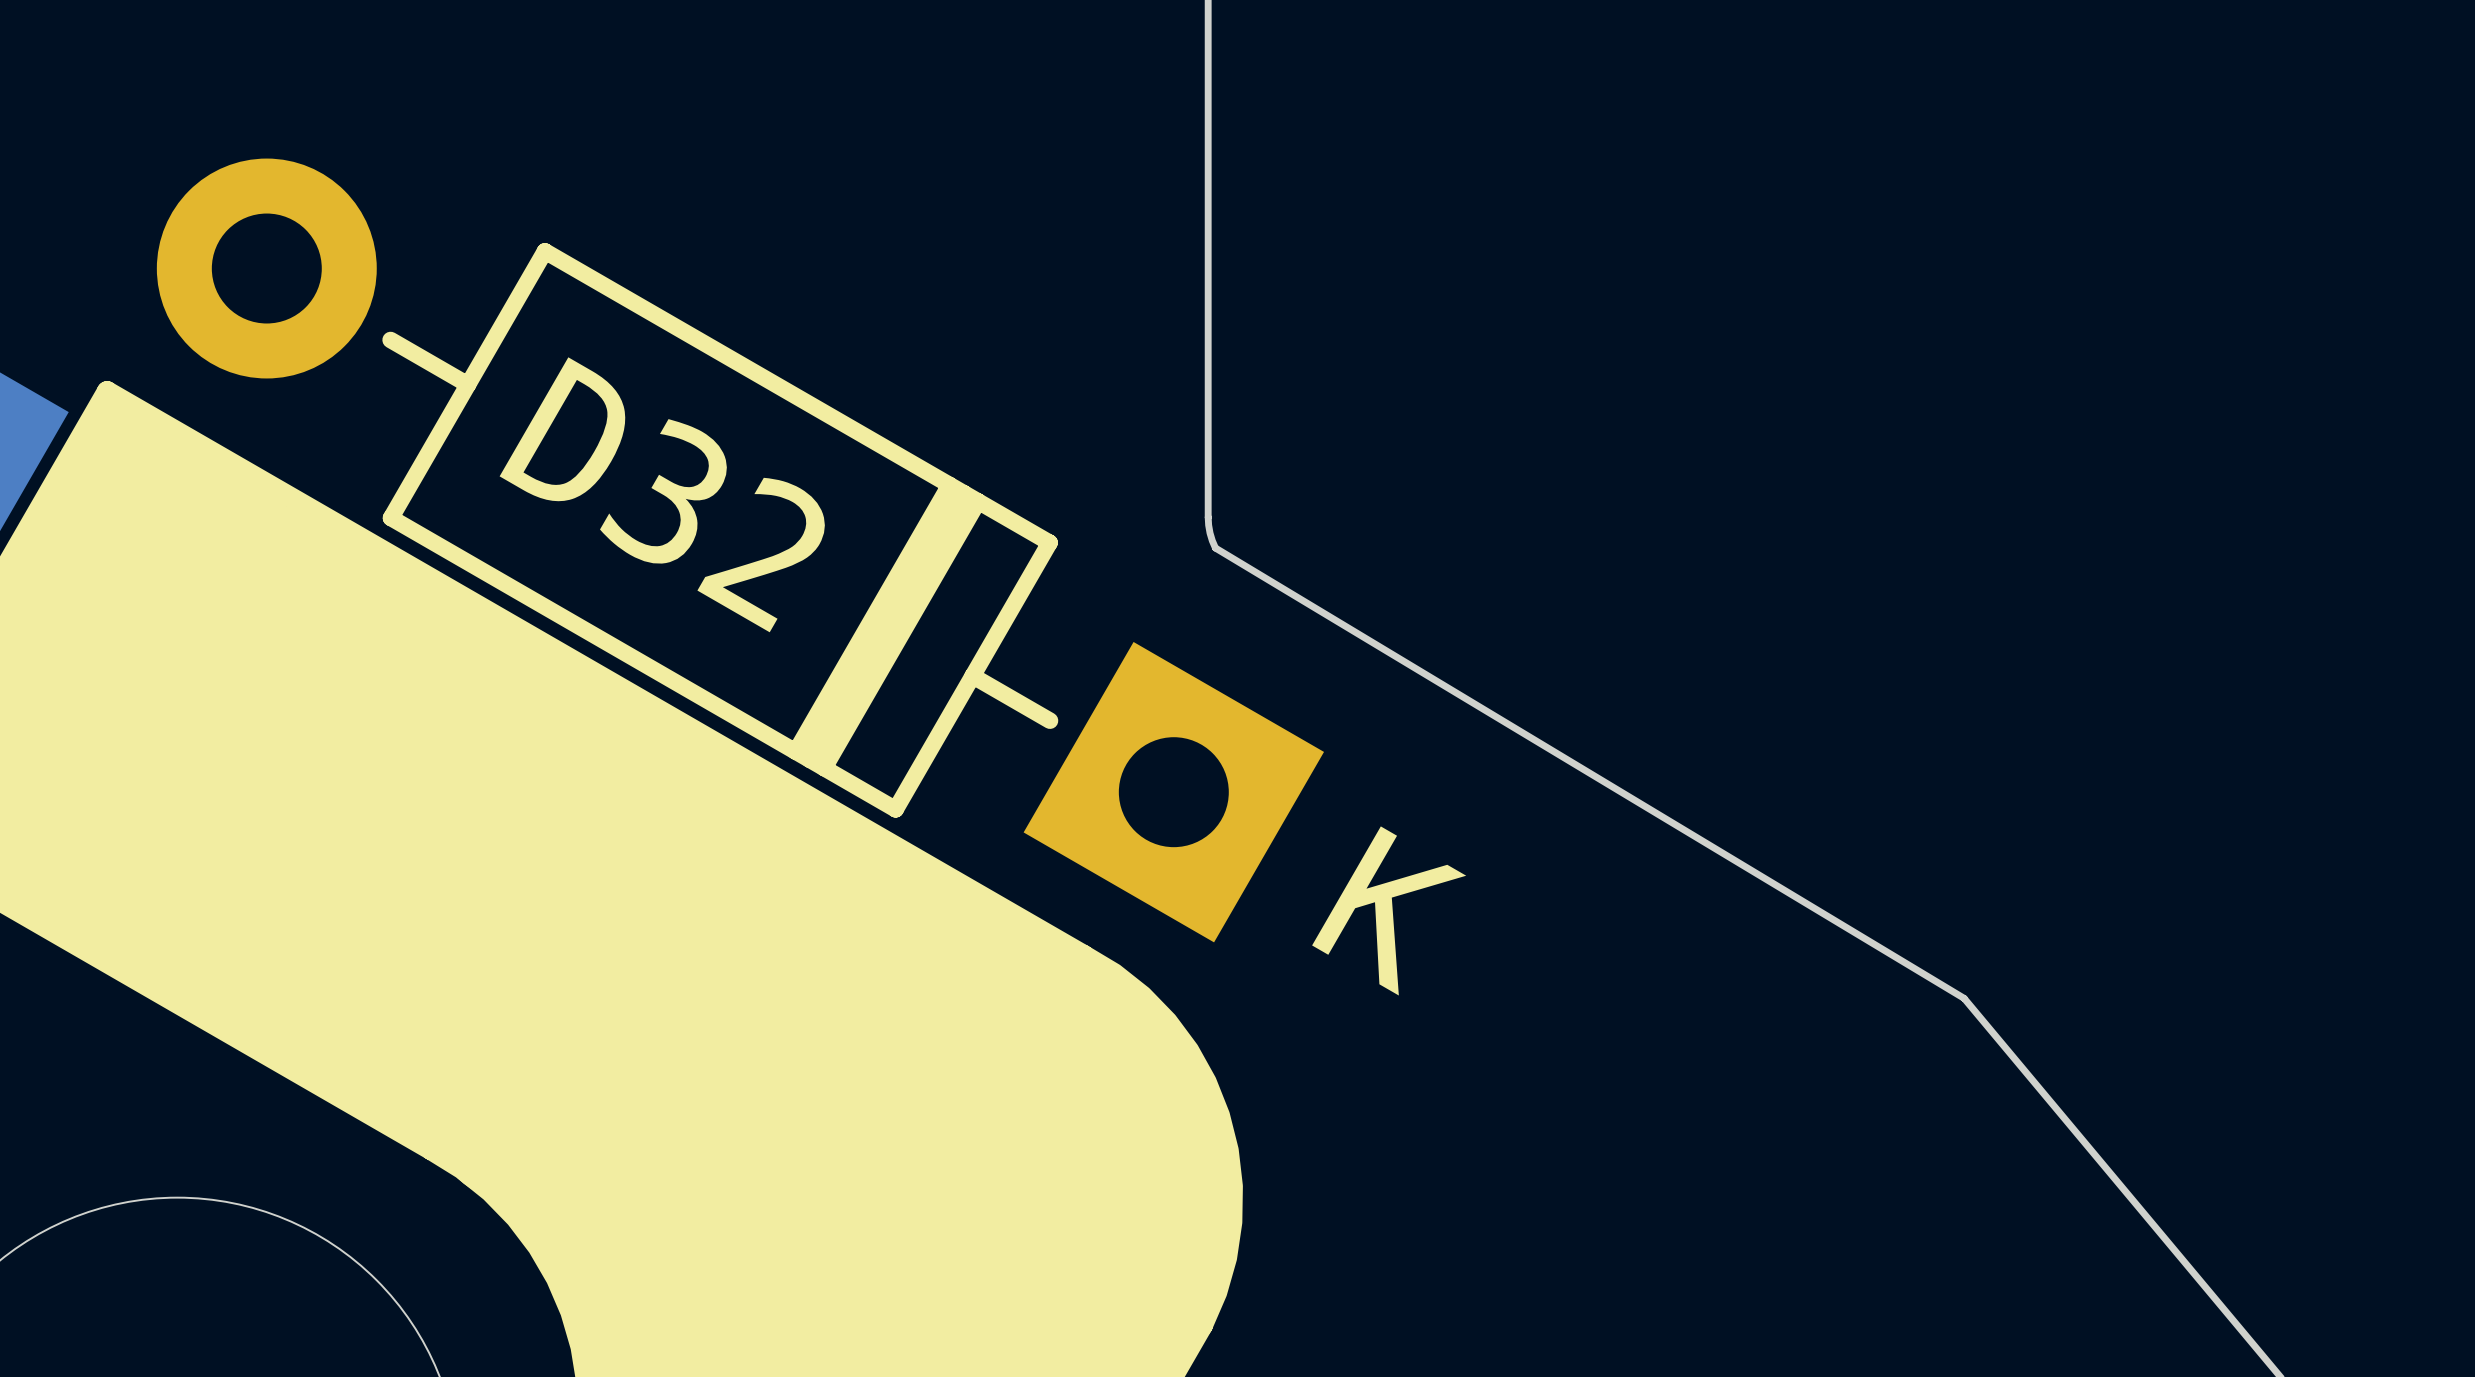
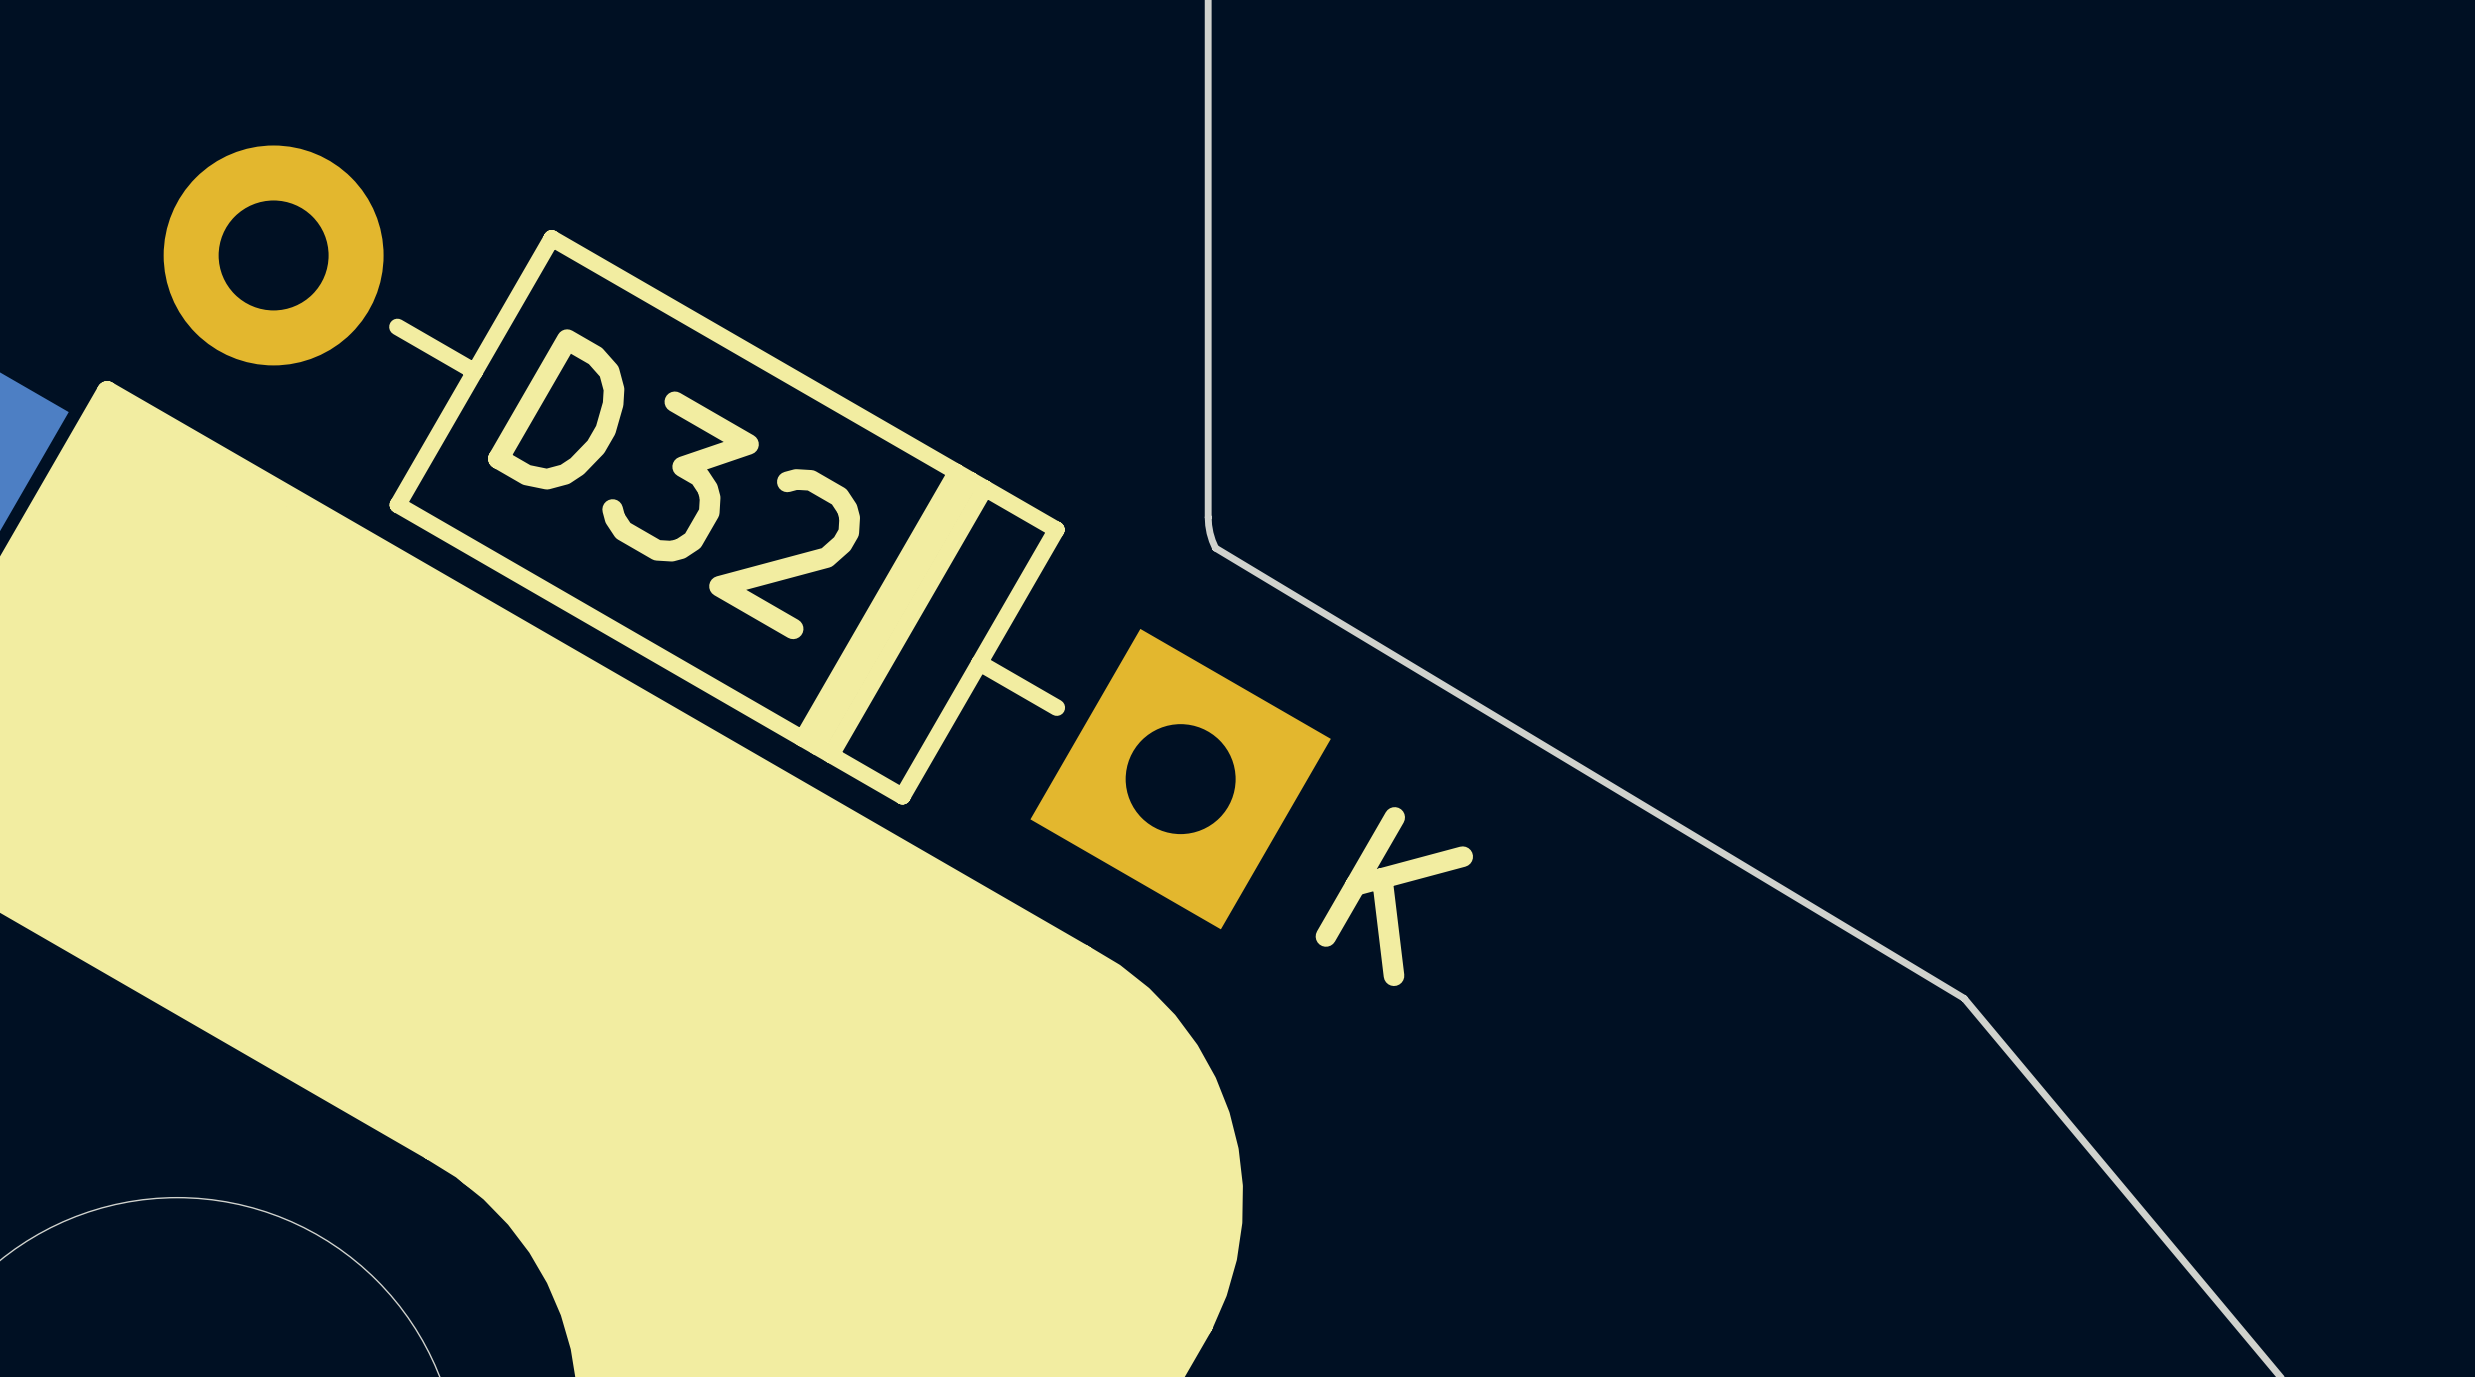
D32 position: (740, 550) -> (747, 537)

